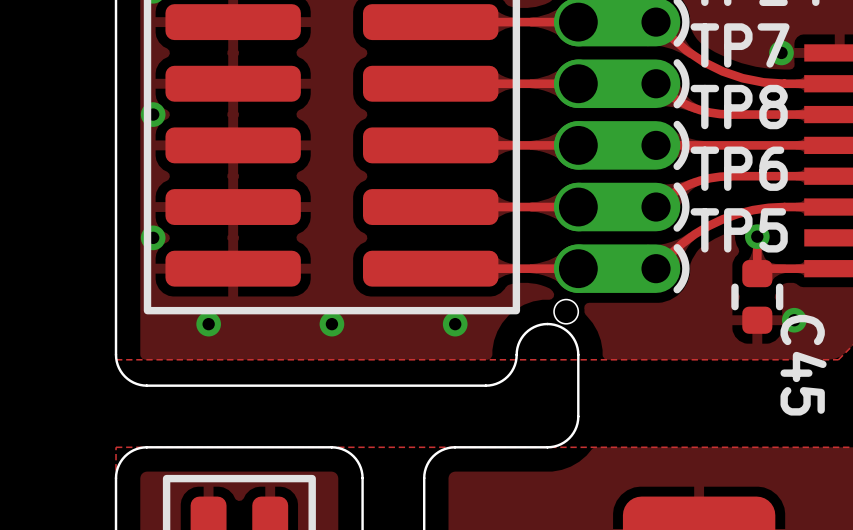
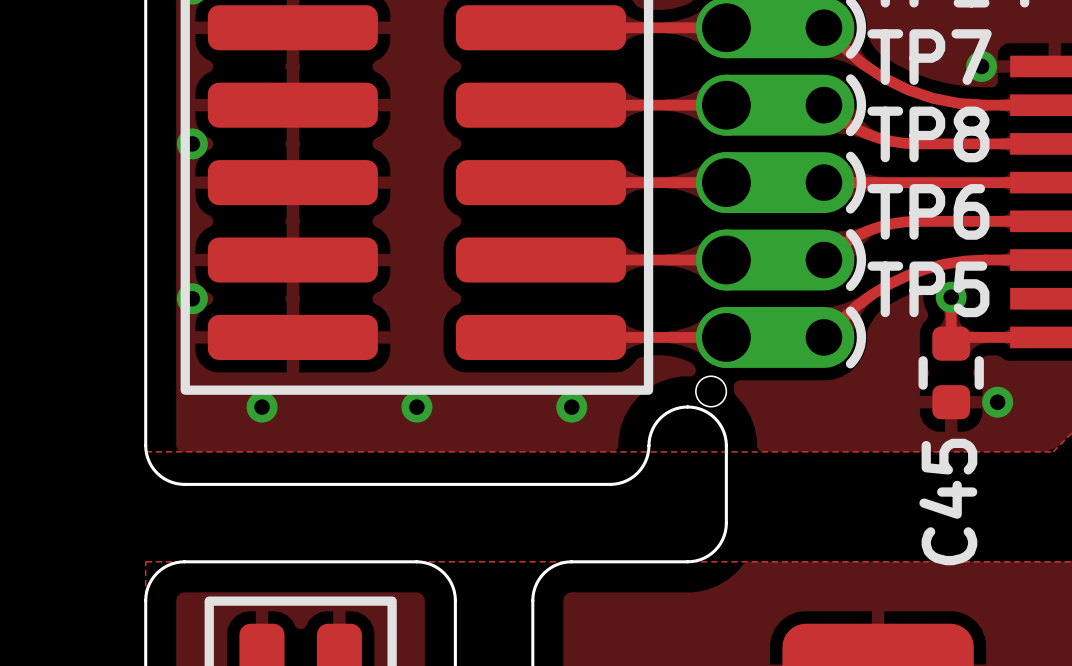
C45 name rotation: 0° (803, 365) -> 180° (948, 501)

